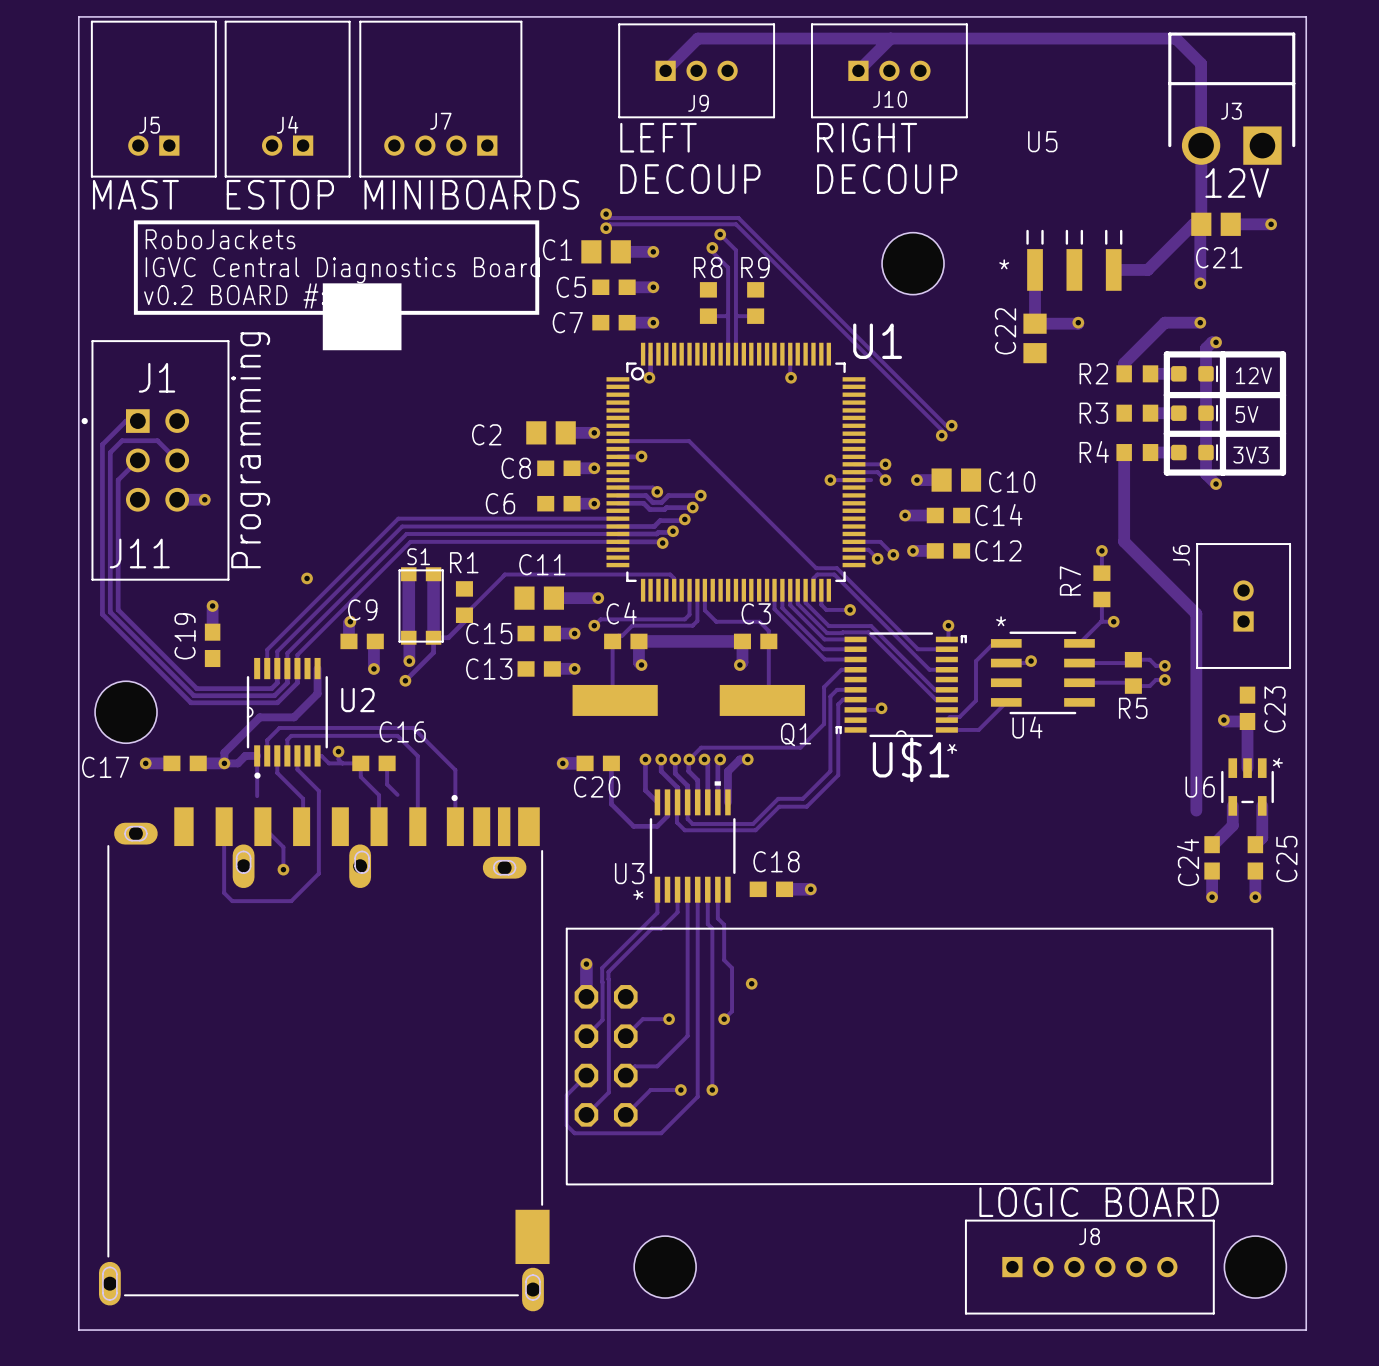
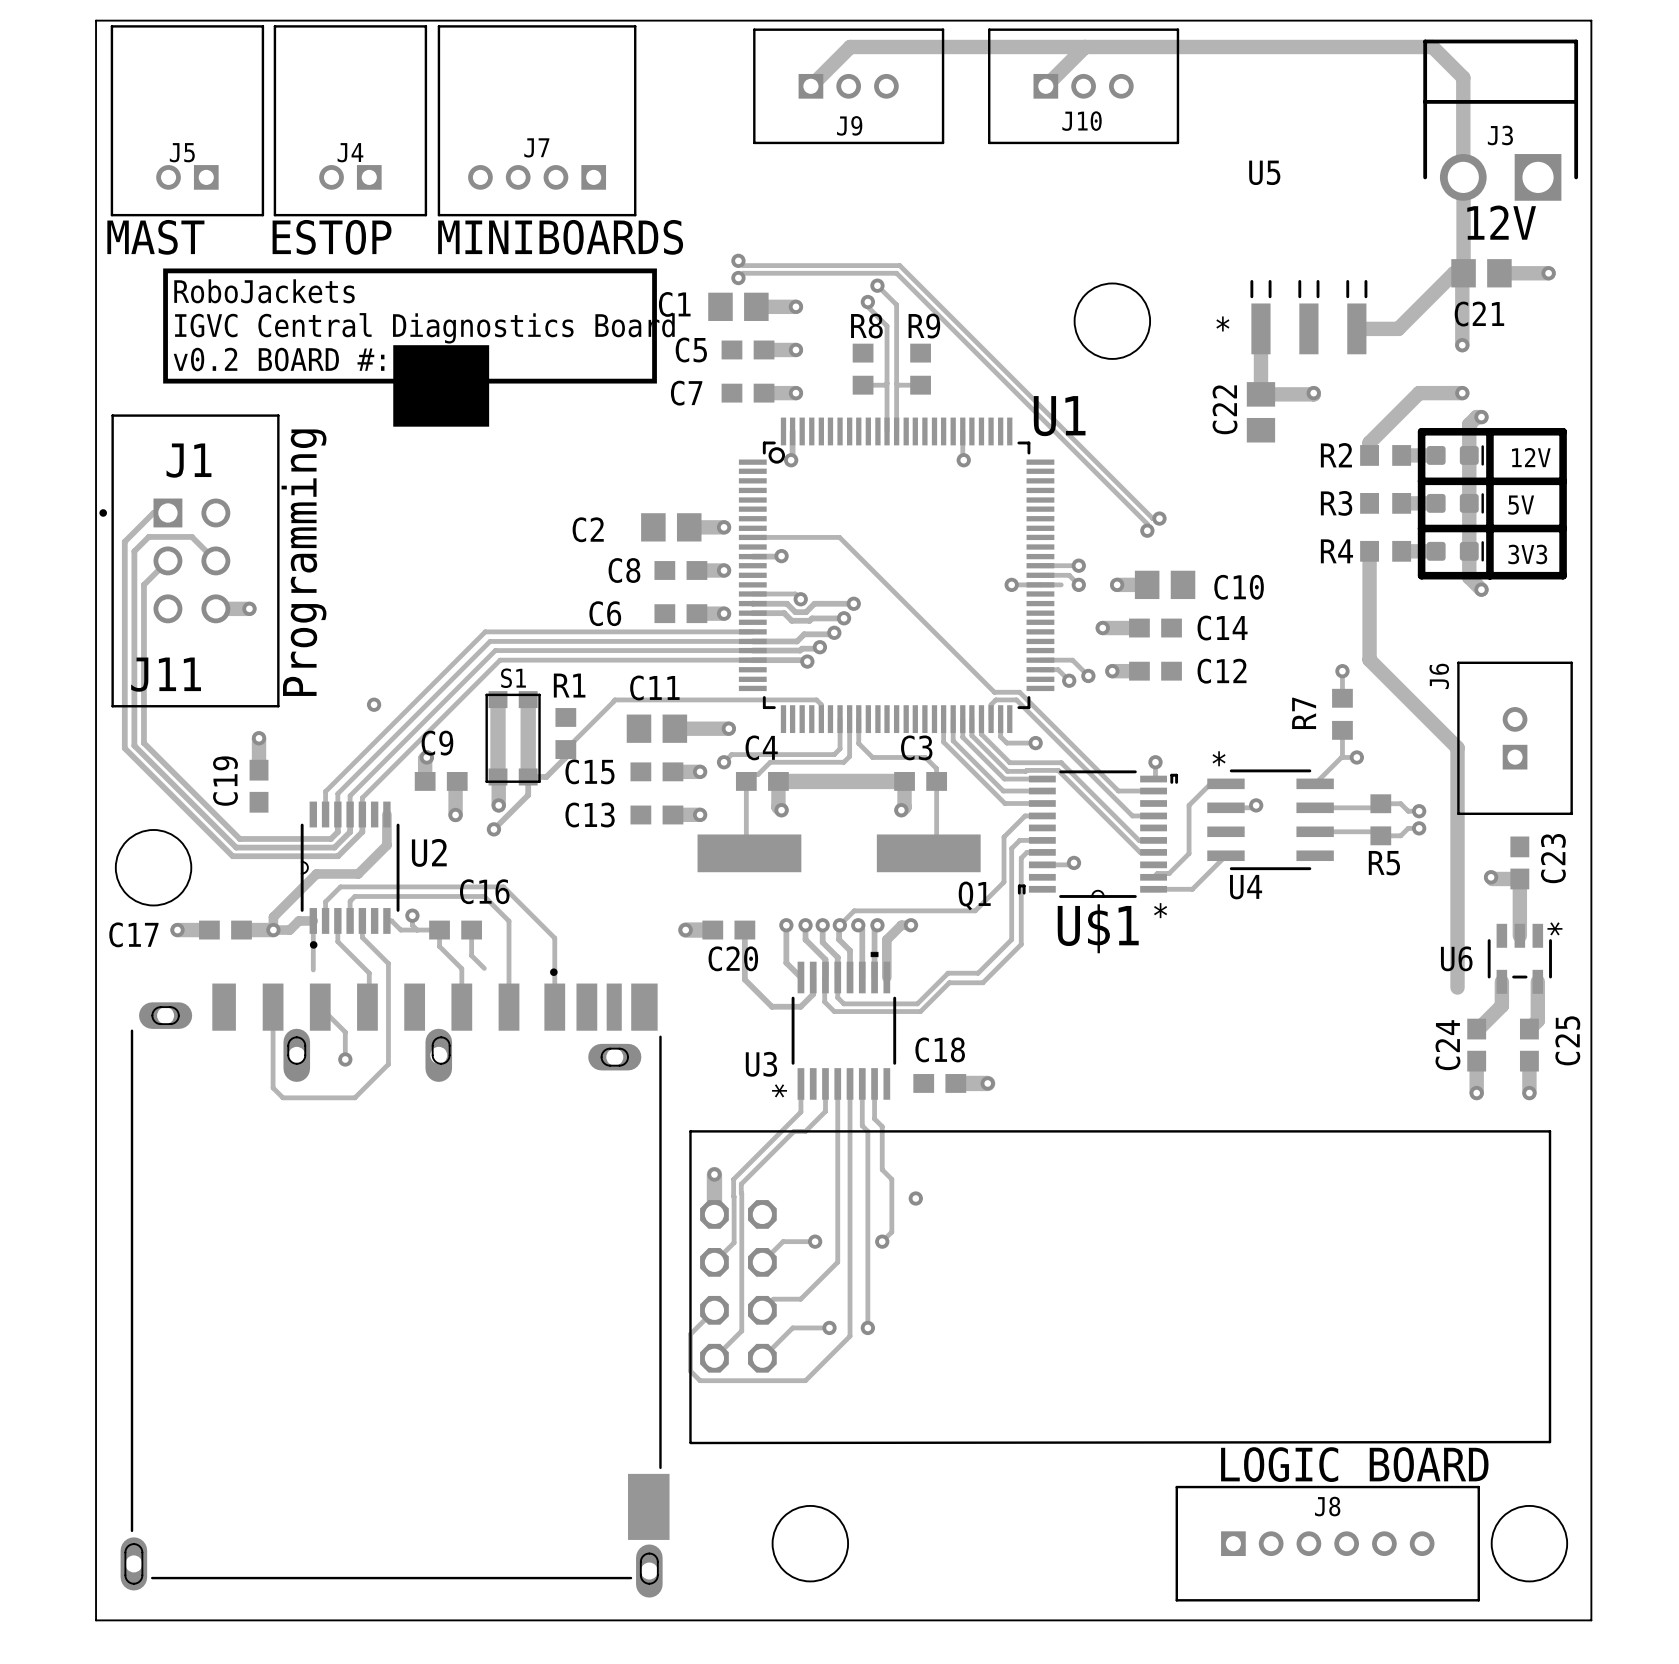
text: LEFT (658, 137) -> none
text: RIGHT (867, 137) -> none
text: DECOUP (690, 179) -> none
text: DECOUP (887, 179) -> none

